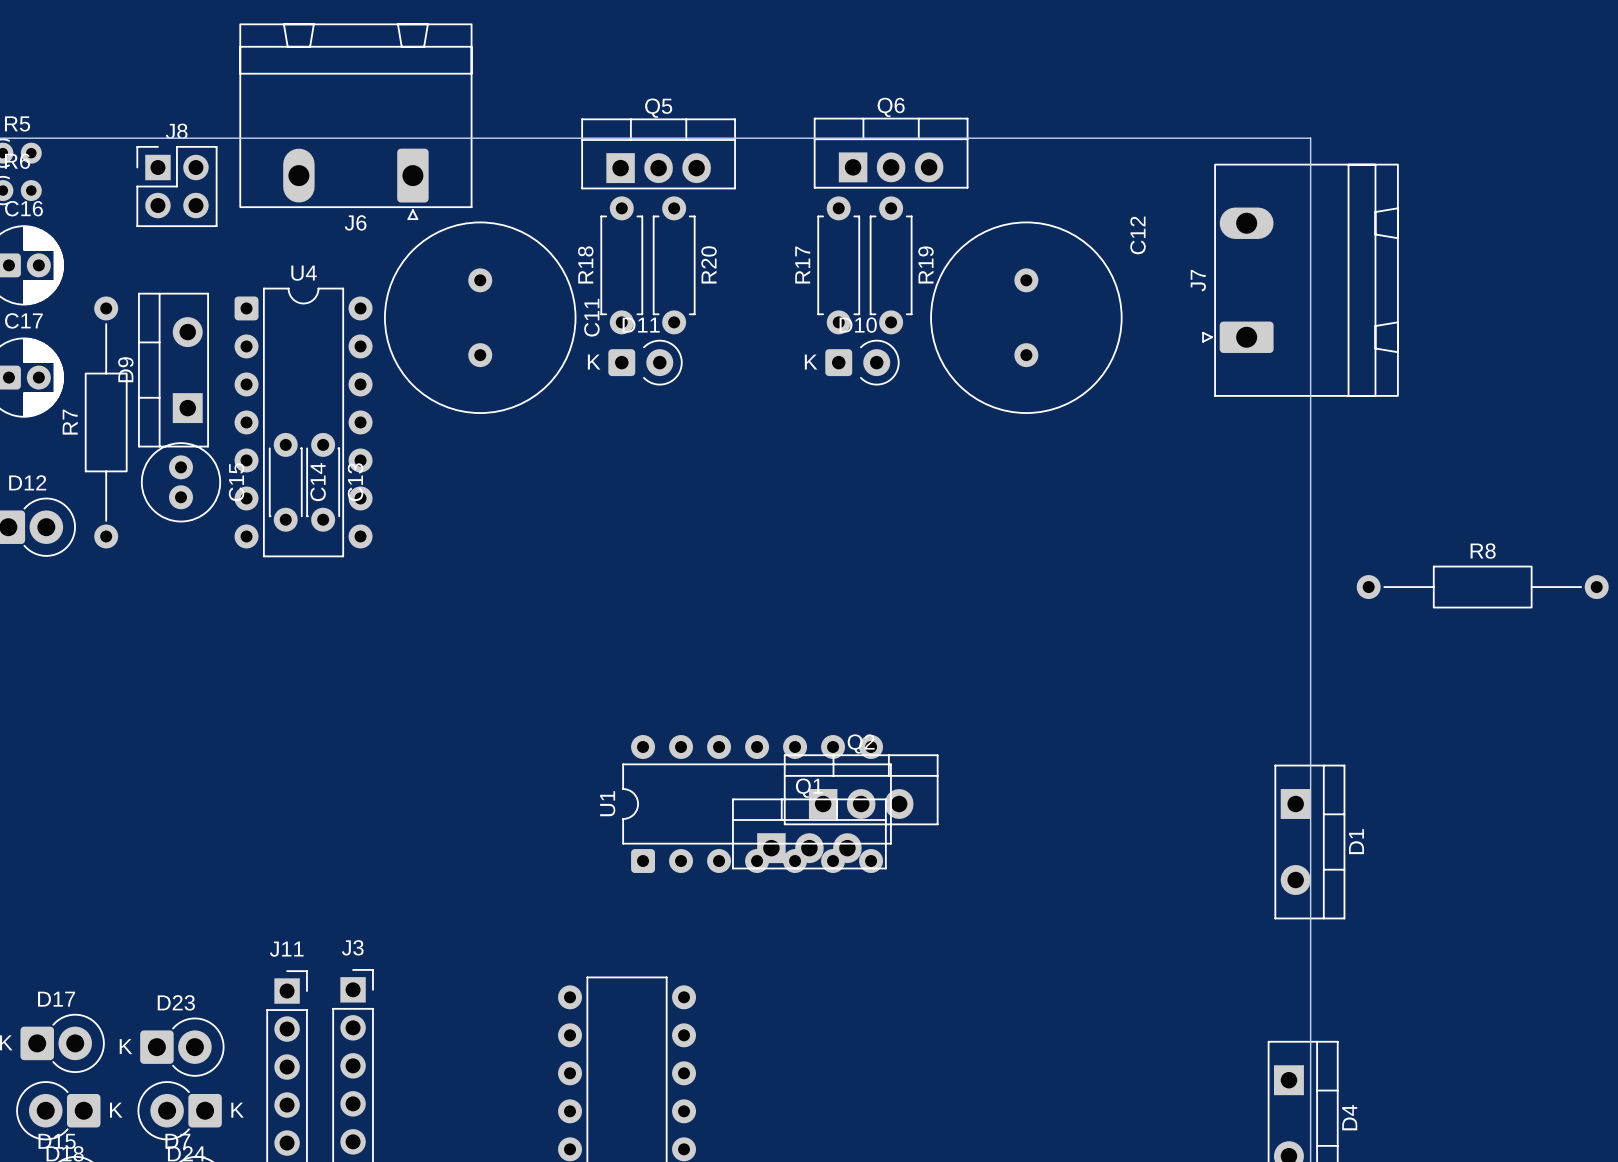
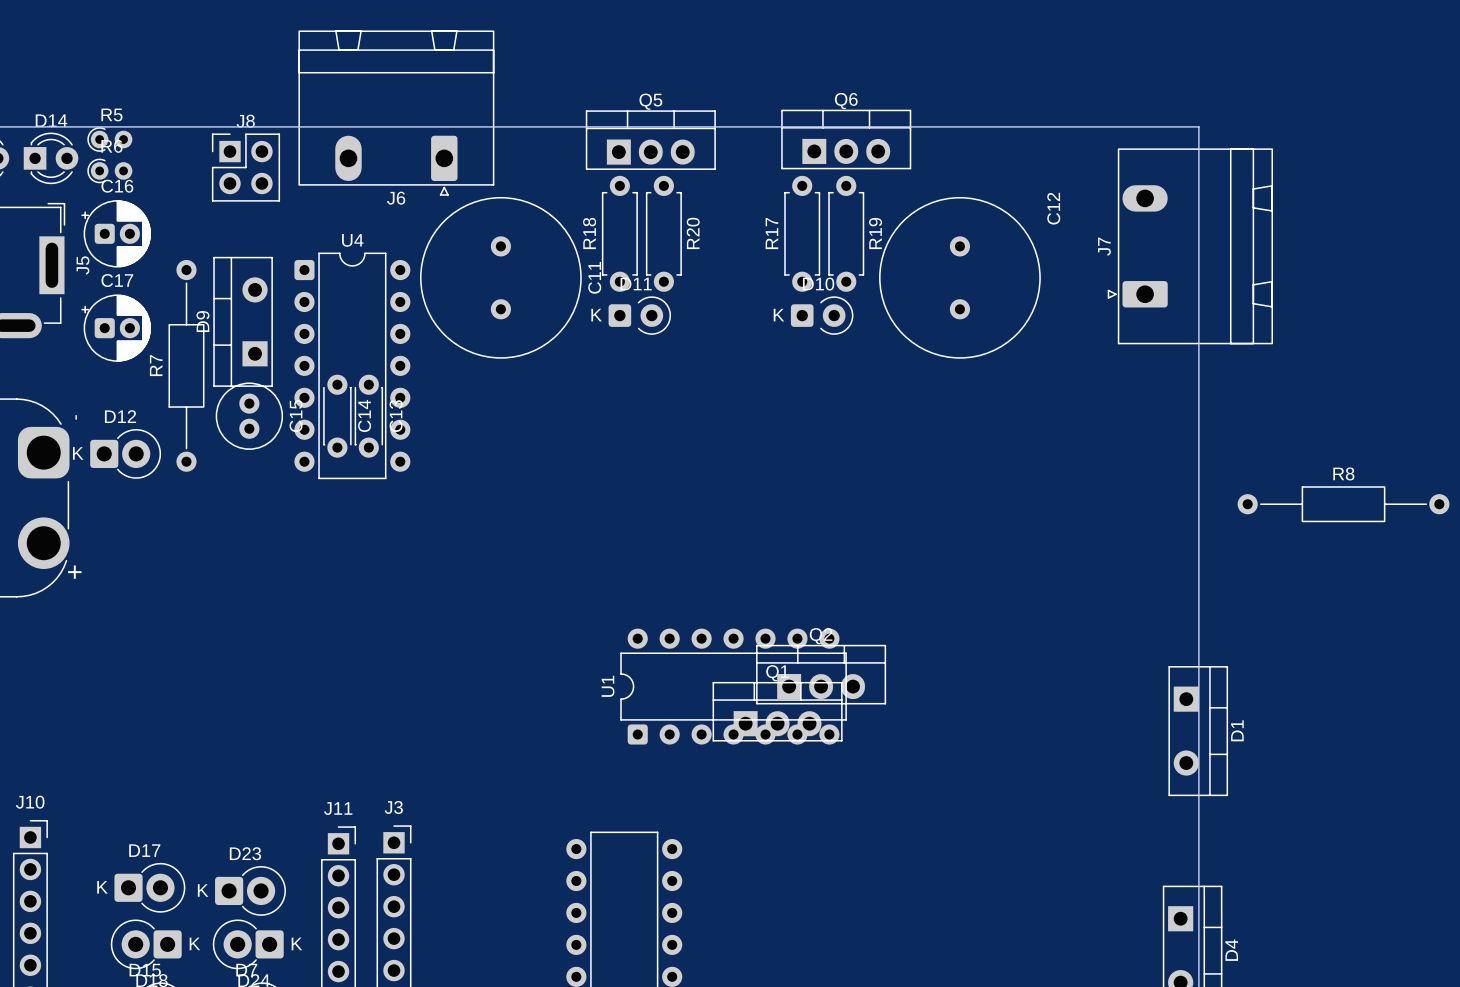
D1 position: (1309, 842) -> (1198, 731)

